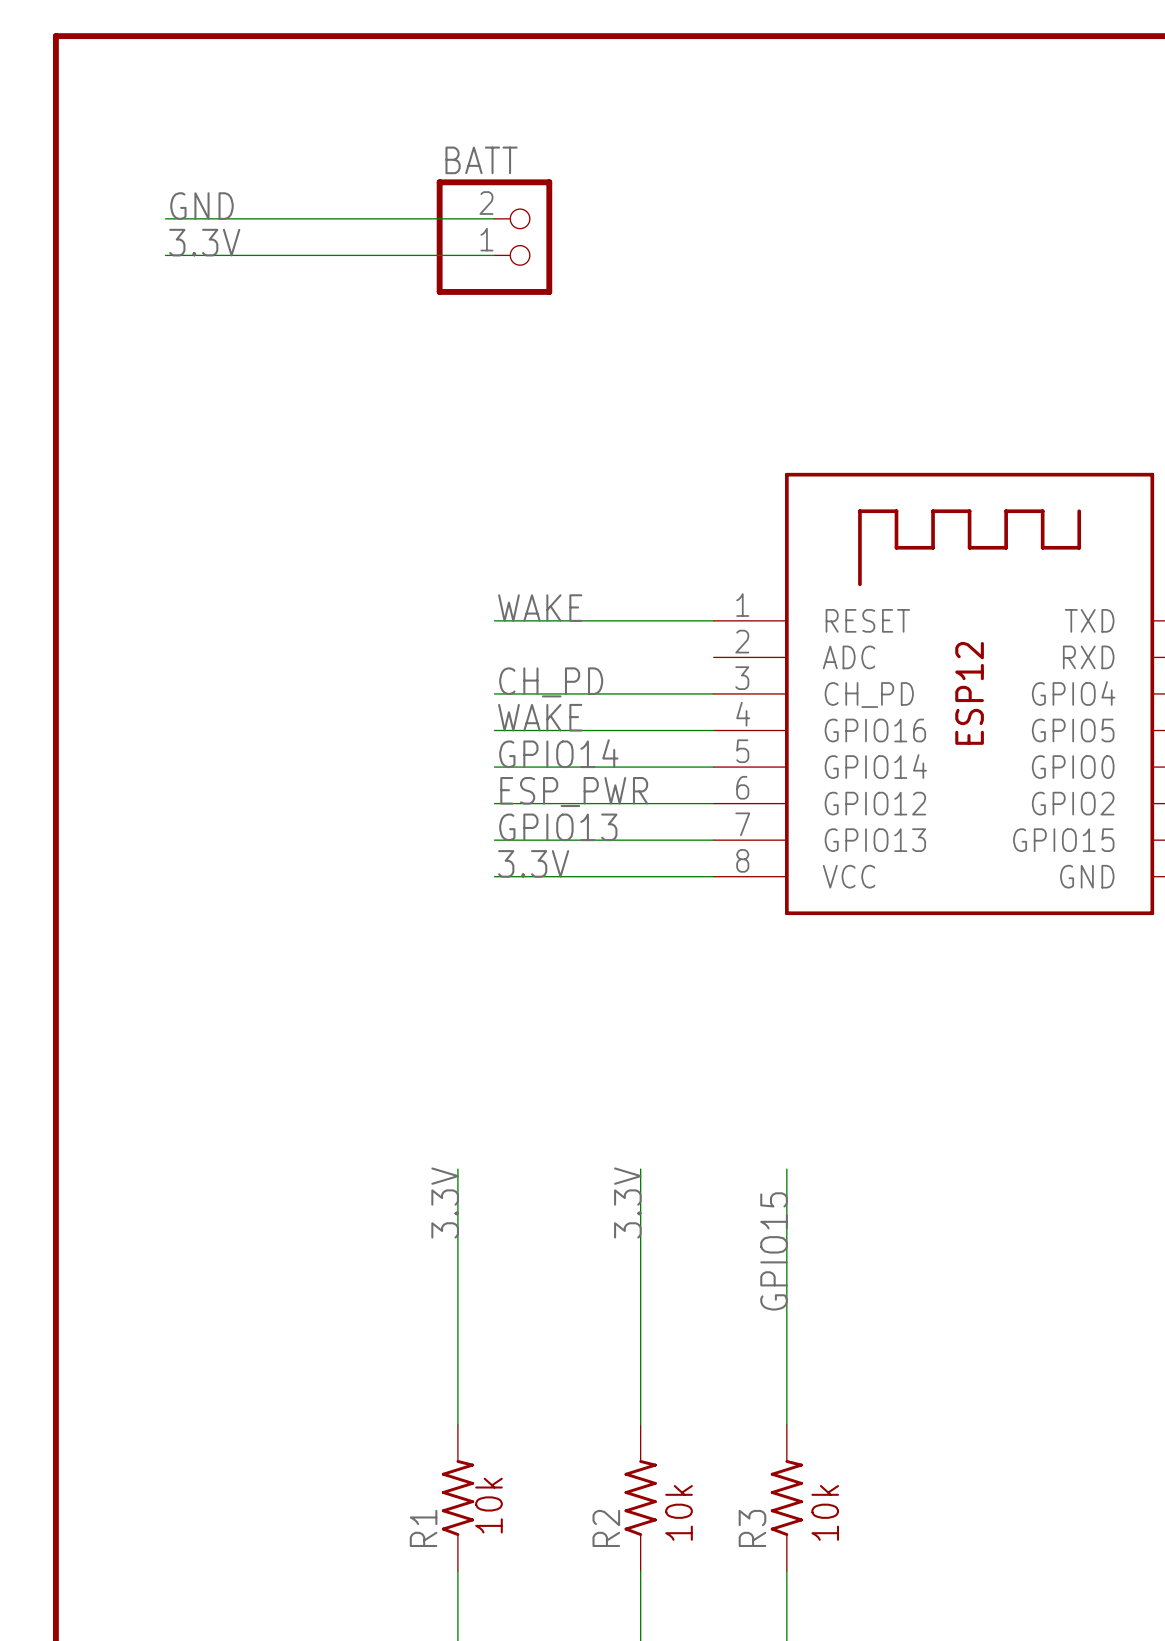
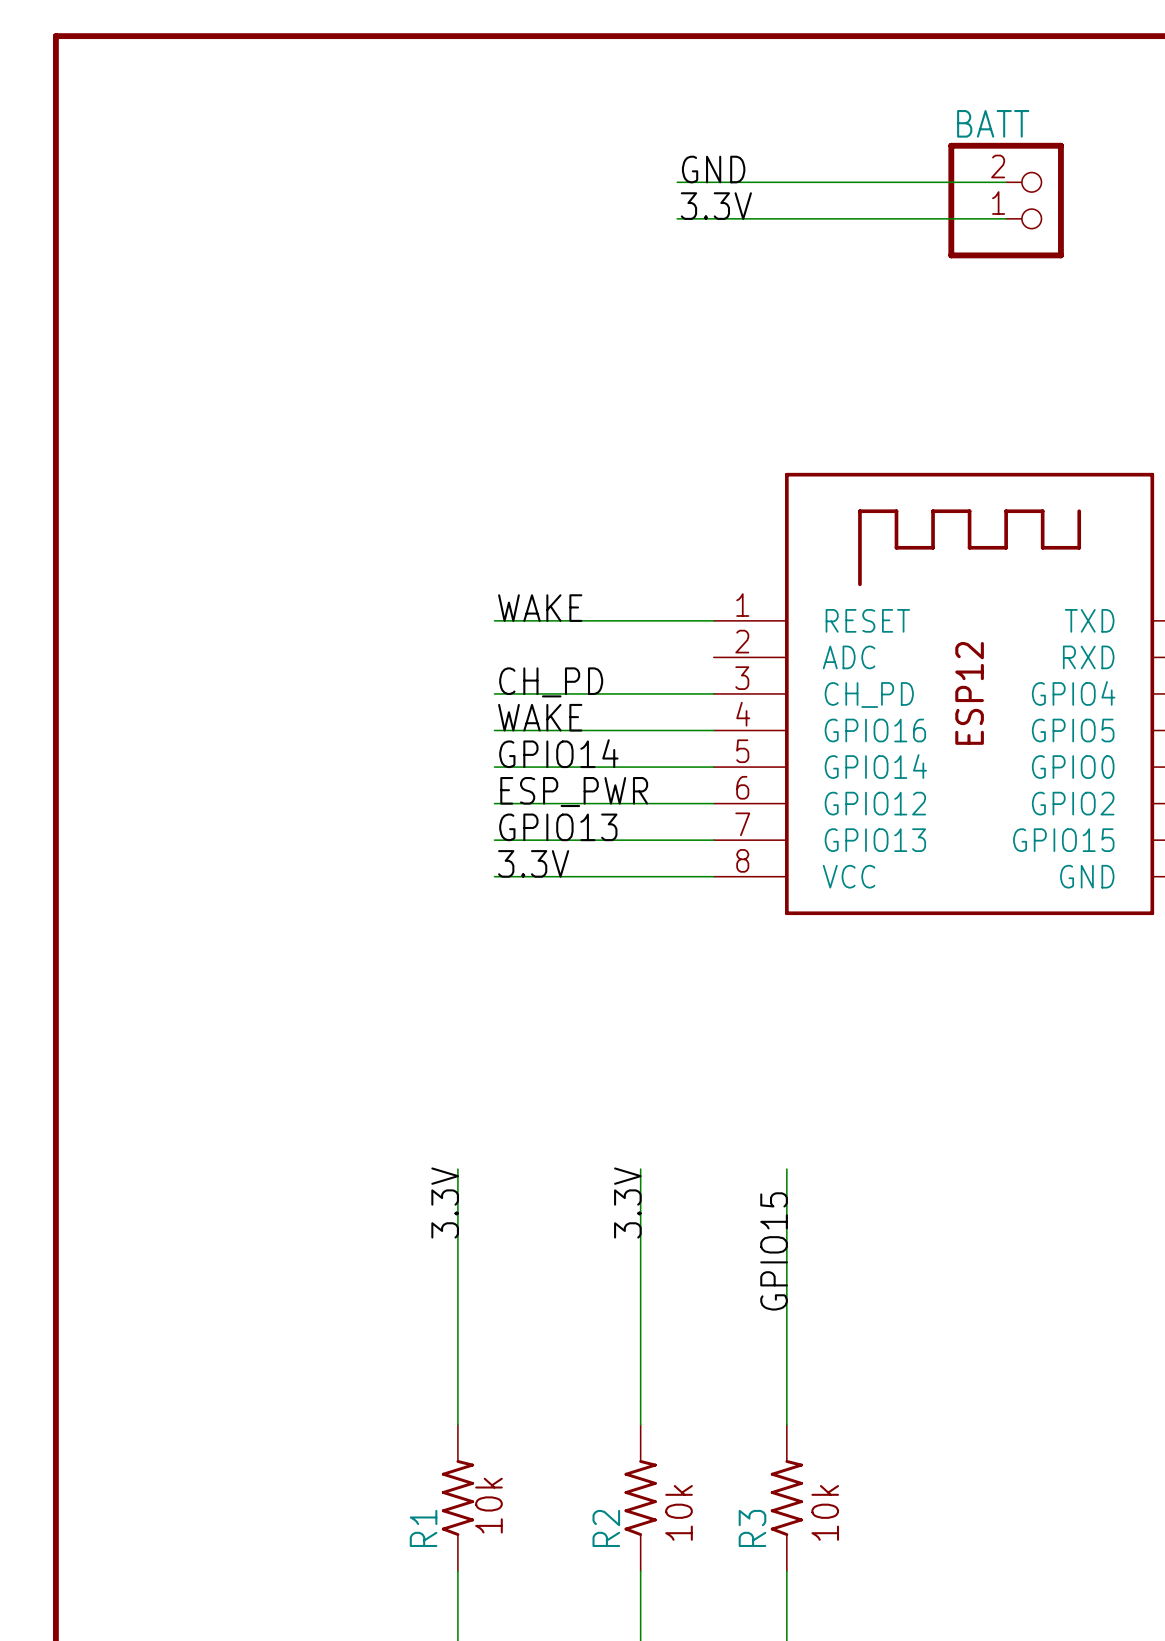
label: none -> GND (713, 169)
wire: none -> (677, 182) (1006, 182)
BATT: none -> (1006, 200)
label: GND (201, 206) -> none
label: none -> 3.3V (716, 206)
wire: (165, 218) (494, 218) -> none
wire: none -> (677, 218) (1006, 218)
BATT: (494, 237) -> none
label: 3.3V (204, 242) -> none
wire: (165, 255) (494, 255) -> none

